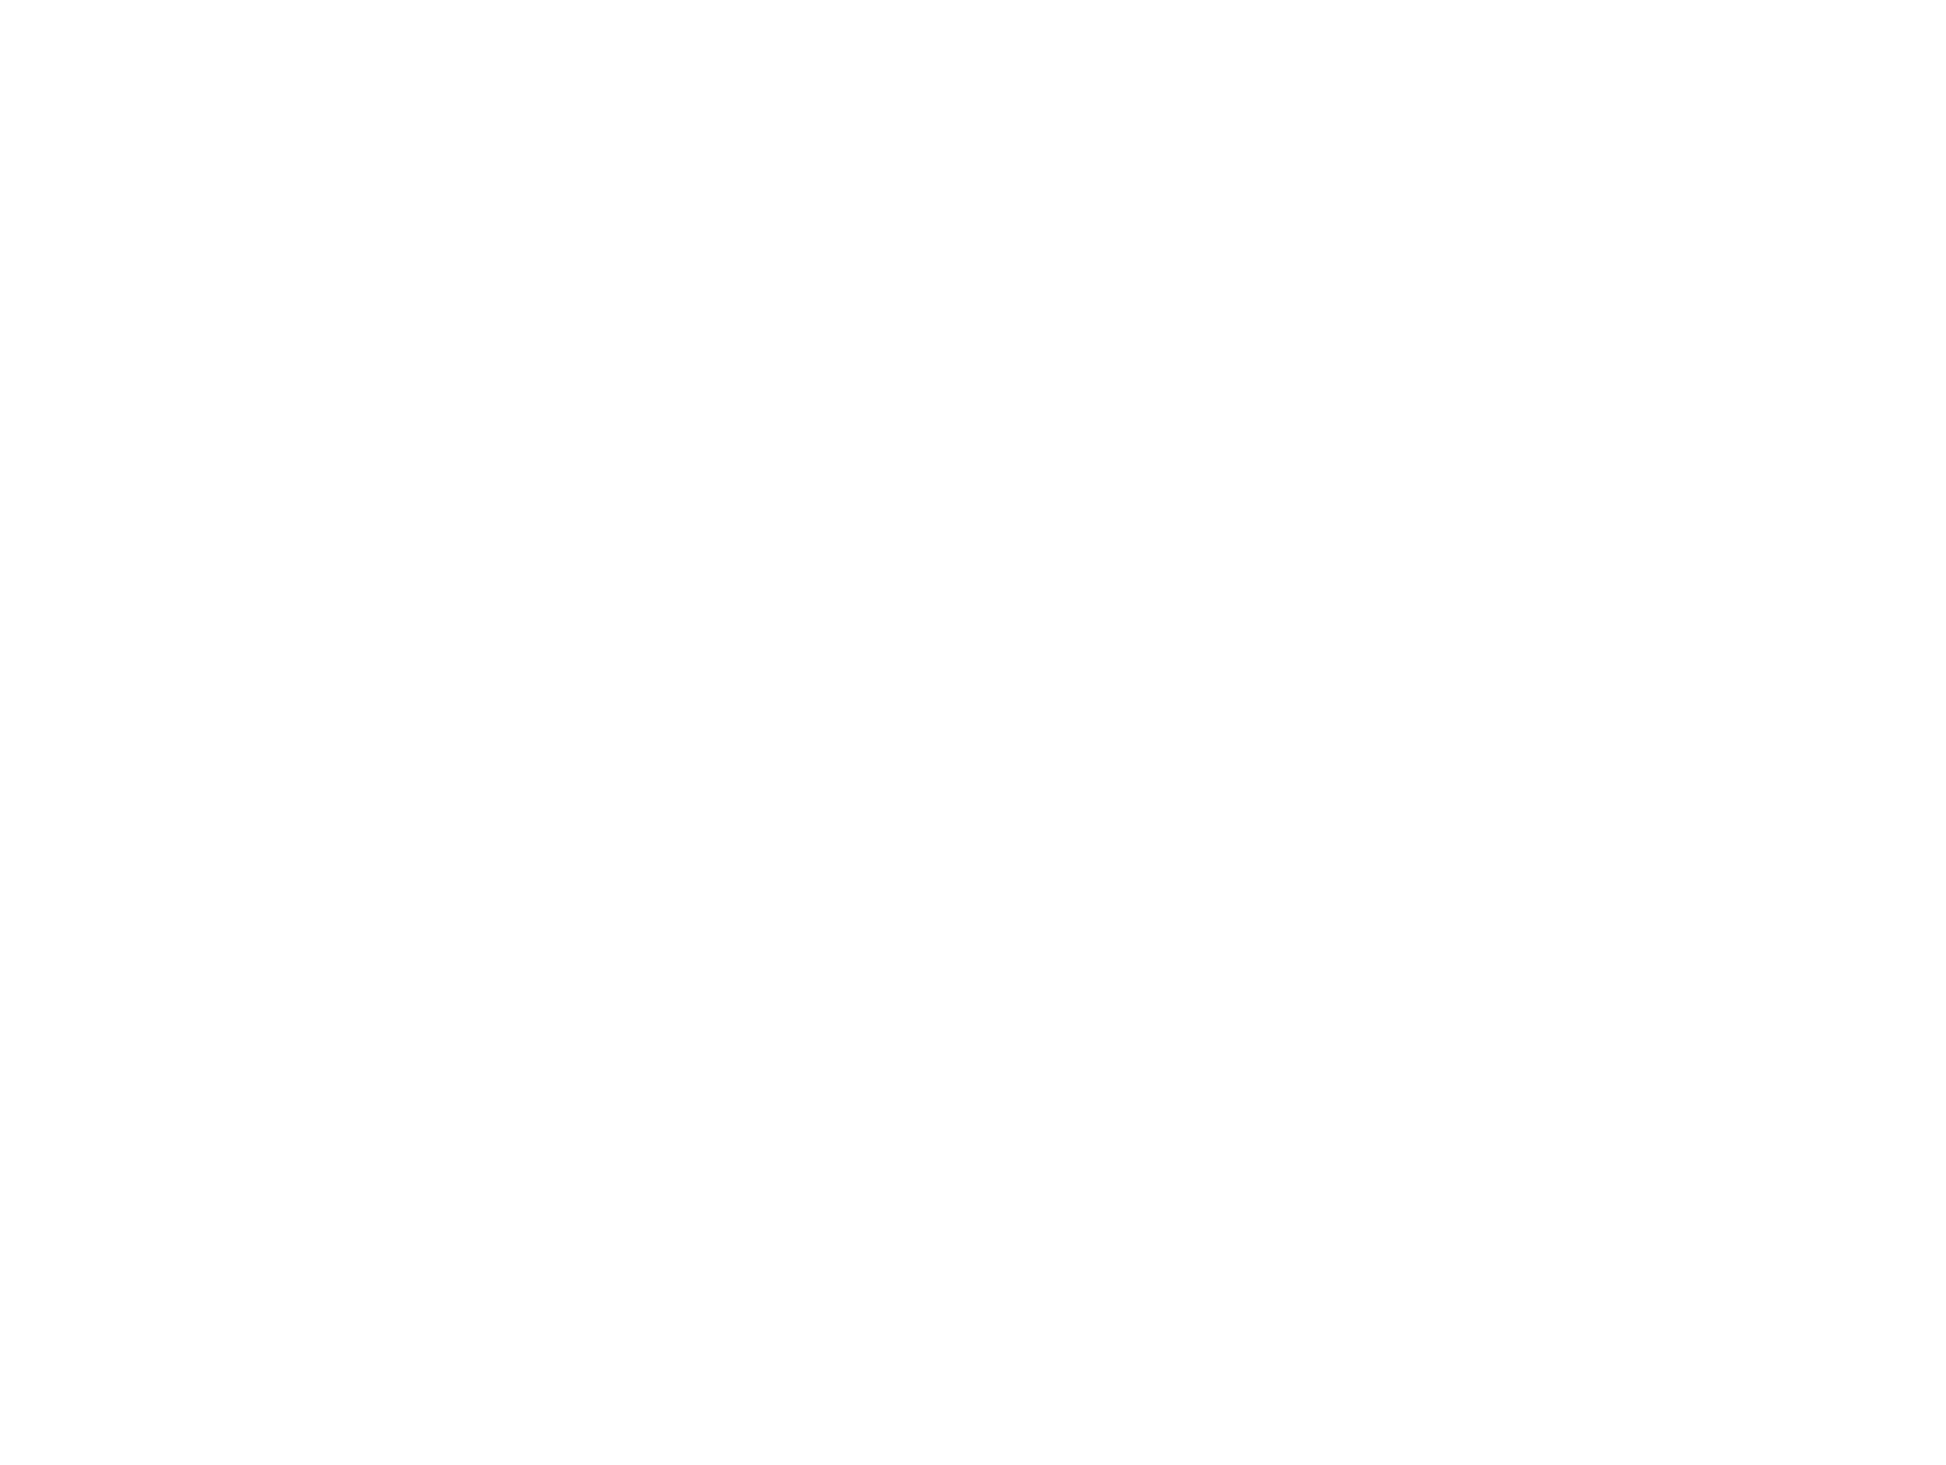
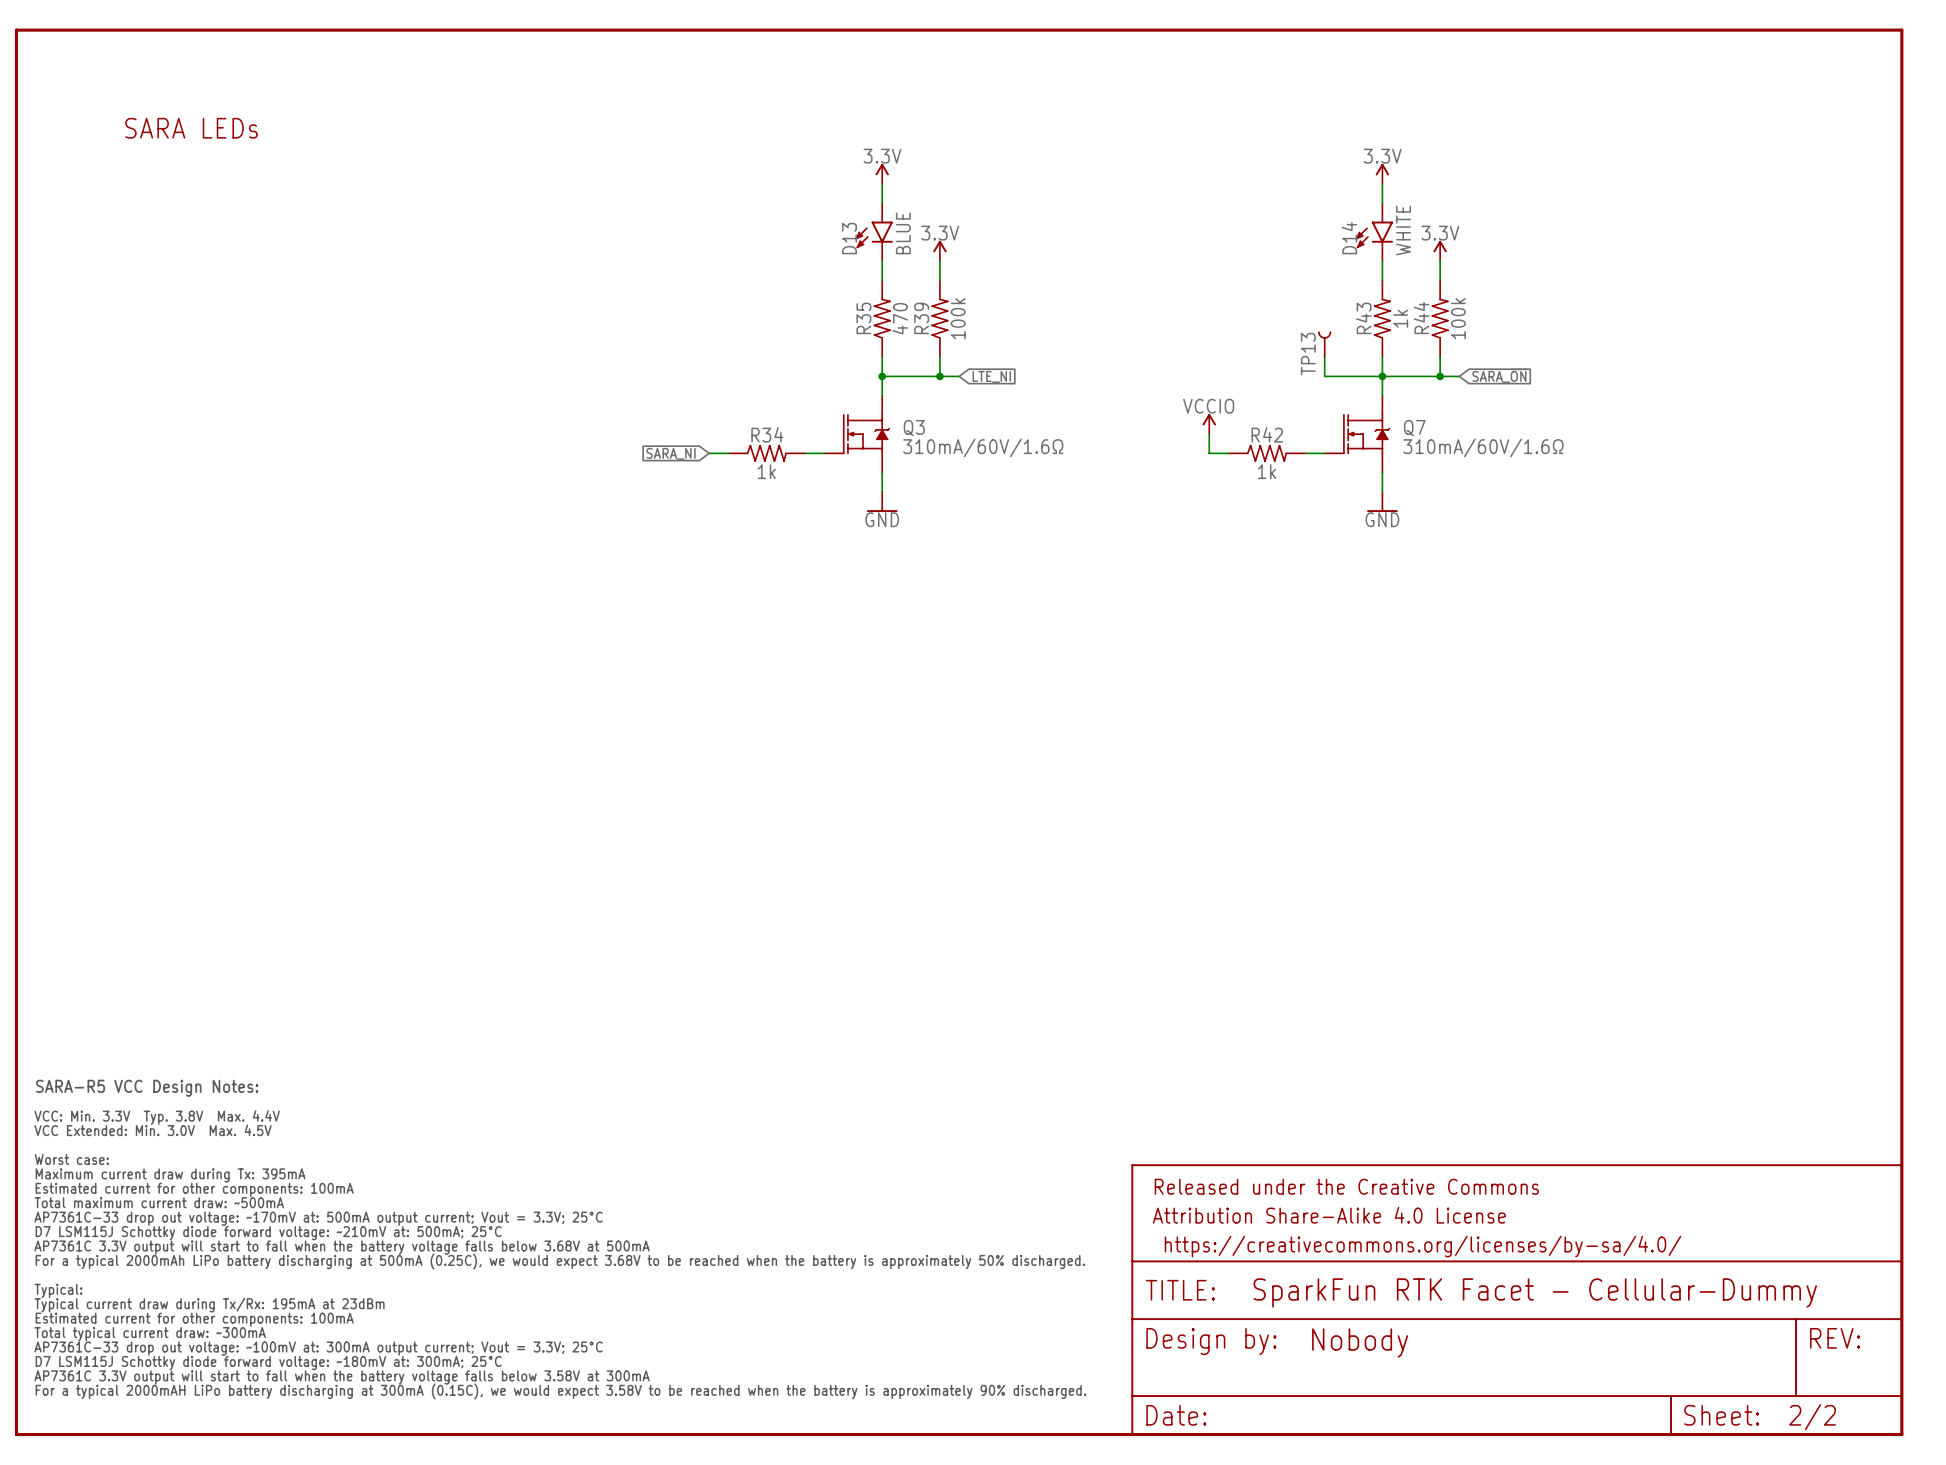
text: none -> SARA LEDs (191, 128)
power symbol: none -> 3.3V (882, 173)
power symbol: none -> 3.3V (1382, 173)
wire: none -> (882, 184) (882, 203)
wire: none -> (1382, 184) (1382, 203)
D13: none -> BLUE (874, 232)
D14: none -> WHITE (1374, 232)
power symbol: none -> 3.3V (939, 250)
power symbol: none -> 3.3V (1440, 250)
wire: none -> (882, 260) (882, 280)
wire: none -> (939, 260) (939, 280)
wire: none -> (1382, 260) (1382, 280)
wire: none -> (1440, 260) (1440, 280)
R35: none -> 470 (882, 318)
R39: none -> 100k (939, 318)
R43: none -> 1k (1382, 318)
R44: none -> 100k (1440, 318)
TP13: none -> (1324, 344)
wire: none -> (882, 357) (882, 395)
wire: none -> (939, 357) (939, 376)
wire: none -> (1324, 357) (1324, 376) (1459, 376)
wire: none -> (1382, 357) (1382, 395)
wire: none -> (1440, 357) (1440, 376)
global label: none -> SARA_~{ON} (1500, 375)
wire: none -> (882, 376) (959, 376)
junction: none -> (882, 376)
junction: none -> (939, 376)
global label: none -> LTE_NI (991, 376)
junction: none -> (1382, 376)
junction: none -> (1440, 376)
power symbol: none -> VCCIO (1209, 424)
Q3: none -> 310mA/60V/1.6Ω (857, 434)
wire: none -> (1209, 434) (1209, 453) (1228, 453)
Q7: none -> 310mA/60V/1.6Ω (1357, 434)
global label: none -> SARA_NI (671, 453)
wire: none -> (709, 453) (728, 453)
R34: none -> 1k (766, 453)
wire: none -> (805, 453) (824, 453)
R42: none -> 1k (1266, 453)
wire: none -> (1305, 453) (1324, 453)
wire: none -> (882, 472) (882, 491)
wire: none -> (1382, 472) (1382, 491)
power symbol: none -> GND (882, 501)
power symbol: none -> GND (1382, 501)
part: none -> (959, 732)
text: none -> SARA-R5 VCC Design Notes: (147, 1088)
text: none -> VCC: Min. 3.3V Typ. 3.8V Max. 4.4V (157, 1117)
text: none -> VCC Extended: Min. 3.0V Max. 4.5V (153, 1130)
text: none -> Worst case: (71, 1159)
text: none -> Maximum current draw during Tx: 395mA (170, 1175)
text: none -> Estimated current for other components: 100mA (194, 1189)
text: none -> Total maximum current draw: ~500mA (159, 1202)
text: none -> AP7361C-33 drop out voltage: ~170mV at: 500mA output current; Vout = 3.3V; 25°C (318, 1218)
text: none -> D7 LSM115J Schottky diode forward voltage: ~210mV at: 500mA; 25°C (268, 1233)
text: none -> AP7361C 3.3V output will start to fall when the battery voltage falls below 3.68V at 500mA (342, 1247)
text: none -> For a typical 2000mAh LiPo battery discharging at 500mA (0.25C), we would expect 3.68V to be reached when the battery is approximately 50% discharged. (560, 1261)
text: none -> Typical: (58, 1290)
part: none -> (1517, 1299)
text: none -> Typical current draw during Tx/Rx: 195mA at 23dBm (209, 1305)
text: none -> Estimated current for other components: 100mA (194, 1319)
text: none -> Total typical current draw: ~300mA (150, 1334)
text: none -> AP7361C-33 drop out voltage: ~100mV at: 300mA output current; Vout = 3.3V; 25°C (318, 1348)
text: none -> D7 LSM115J Schottky diode forward voltage: ~180mV at: 300mA; 25°C (268, 1363)
text: none -> AP7361C 3.3V output will start to fall when the battery voltage falls below 3.58V at 300mA (342, 1377)
text: none -> For a typical 2000mAH LiPo battery discharging at 300mA (0.15C), we would expect 3.58V to be reached when the battery is approximately 90% discharged. (560, 1391)

